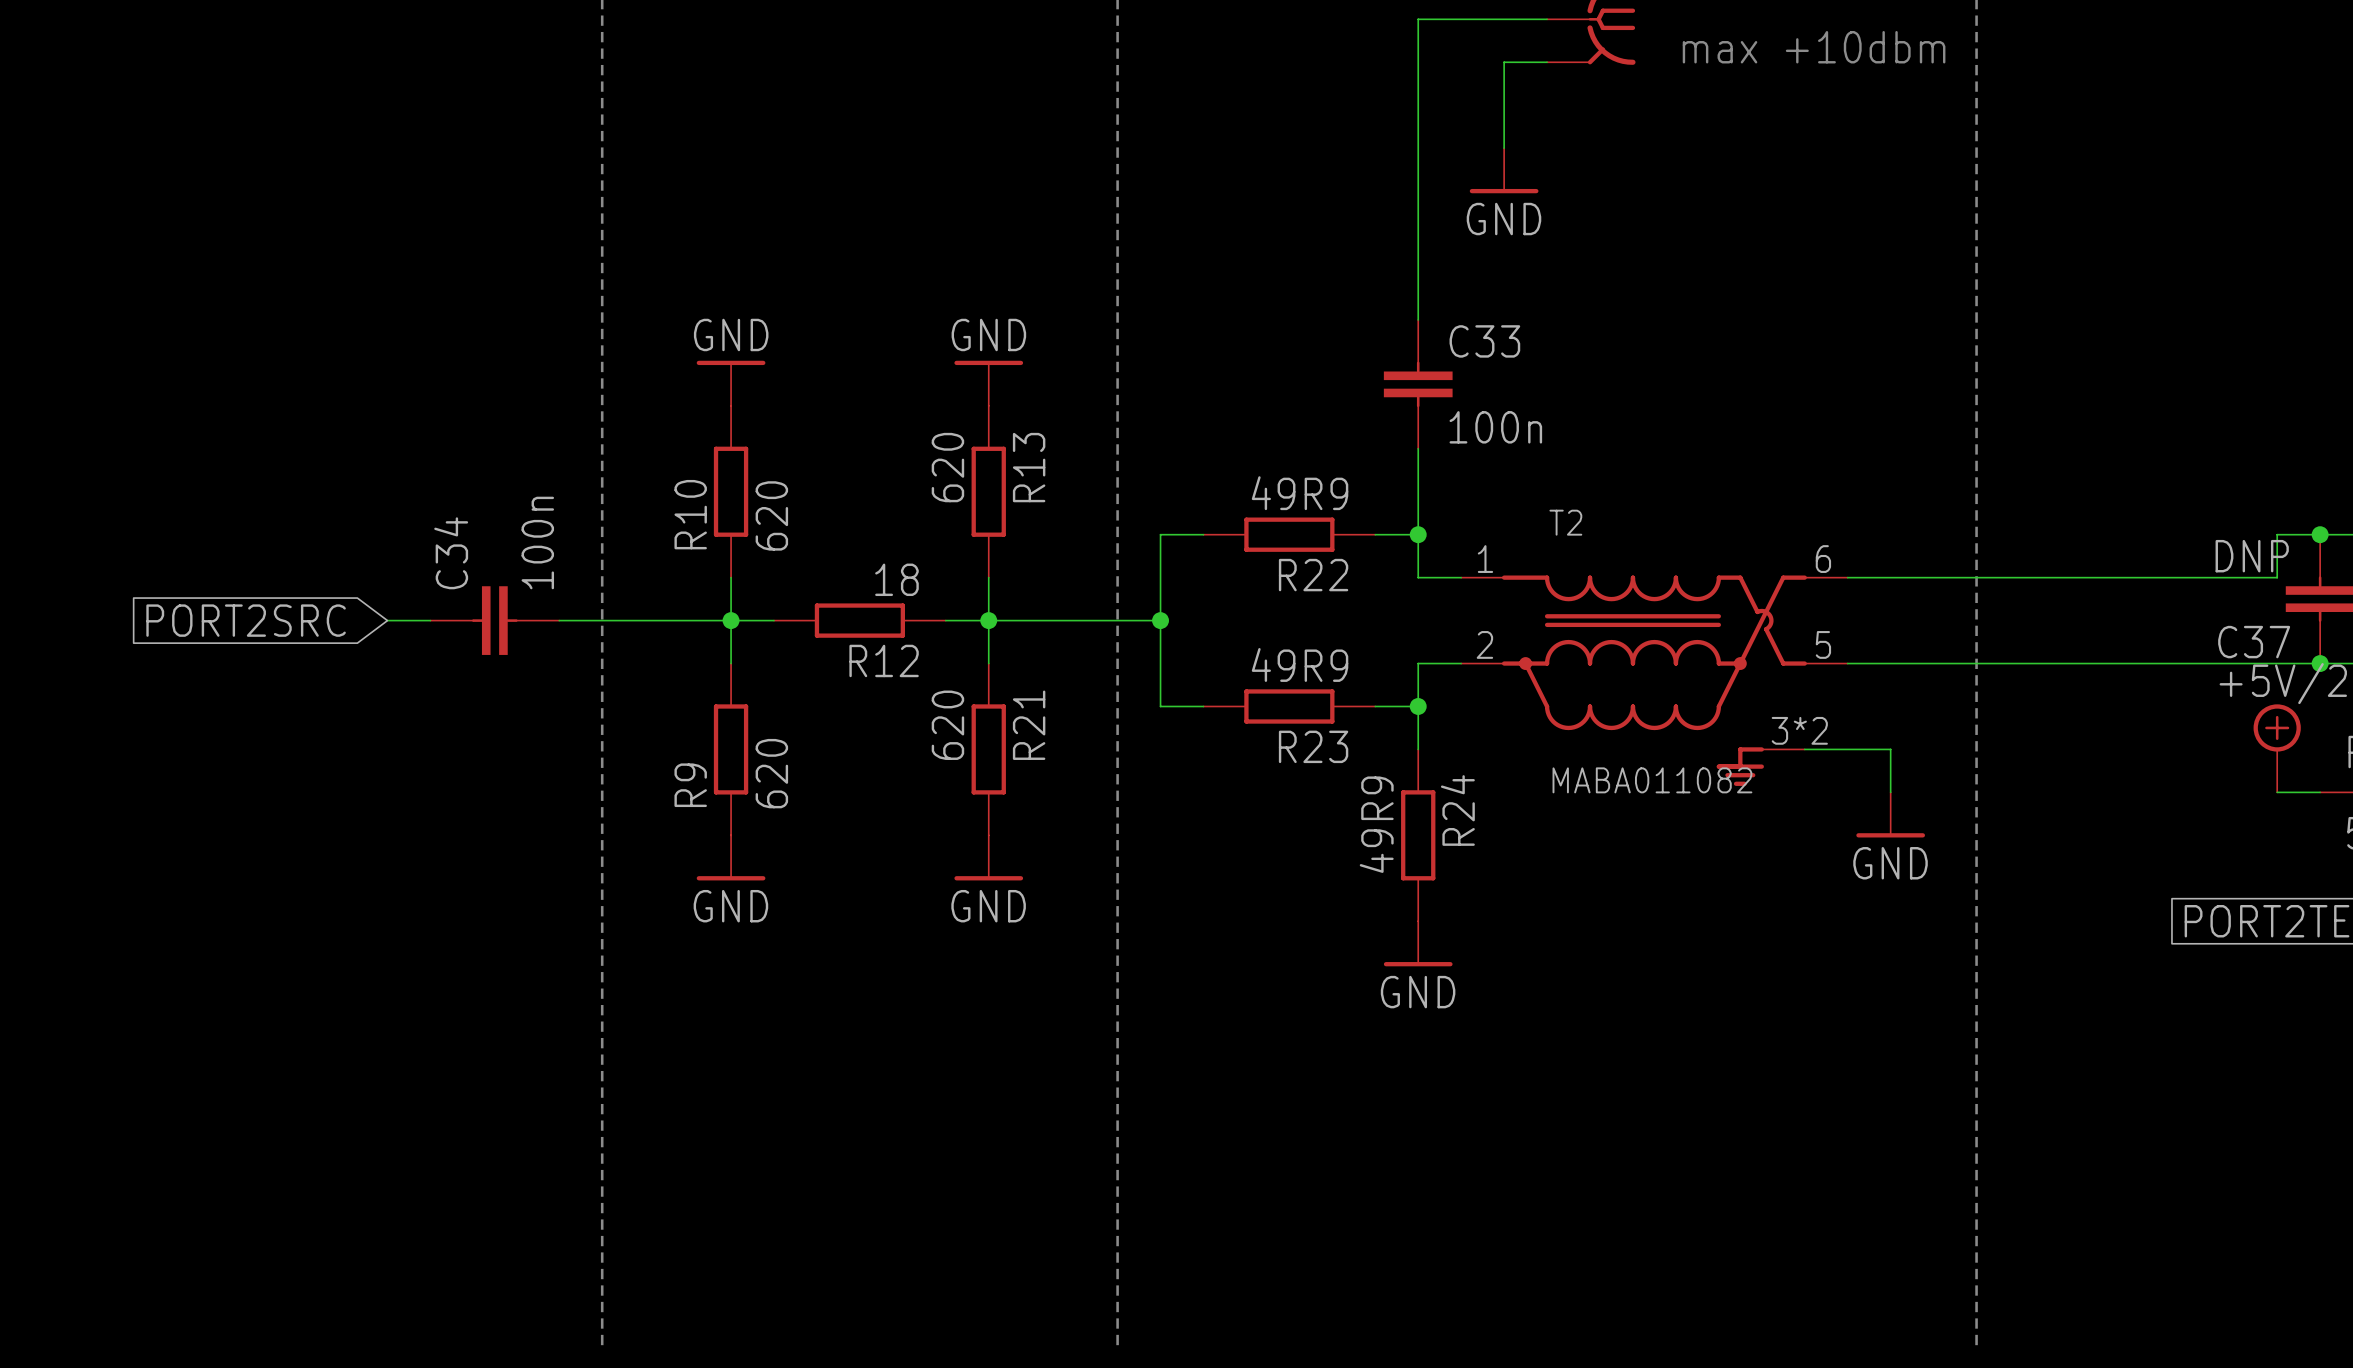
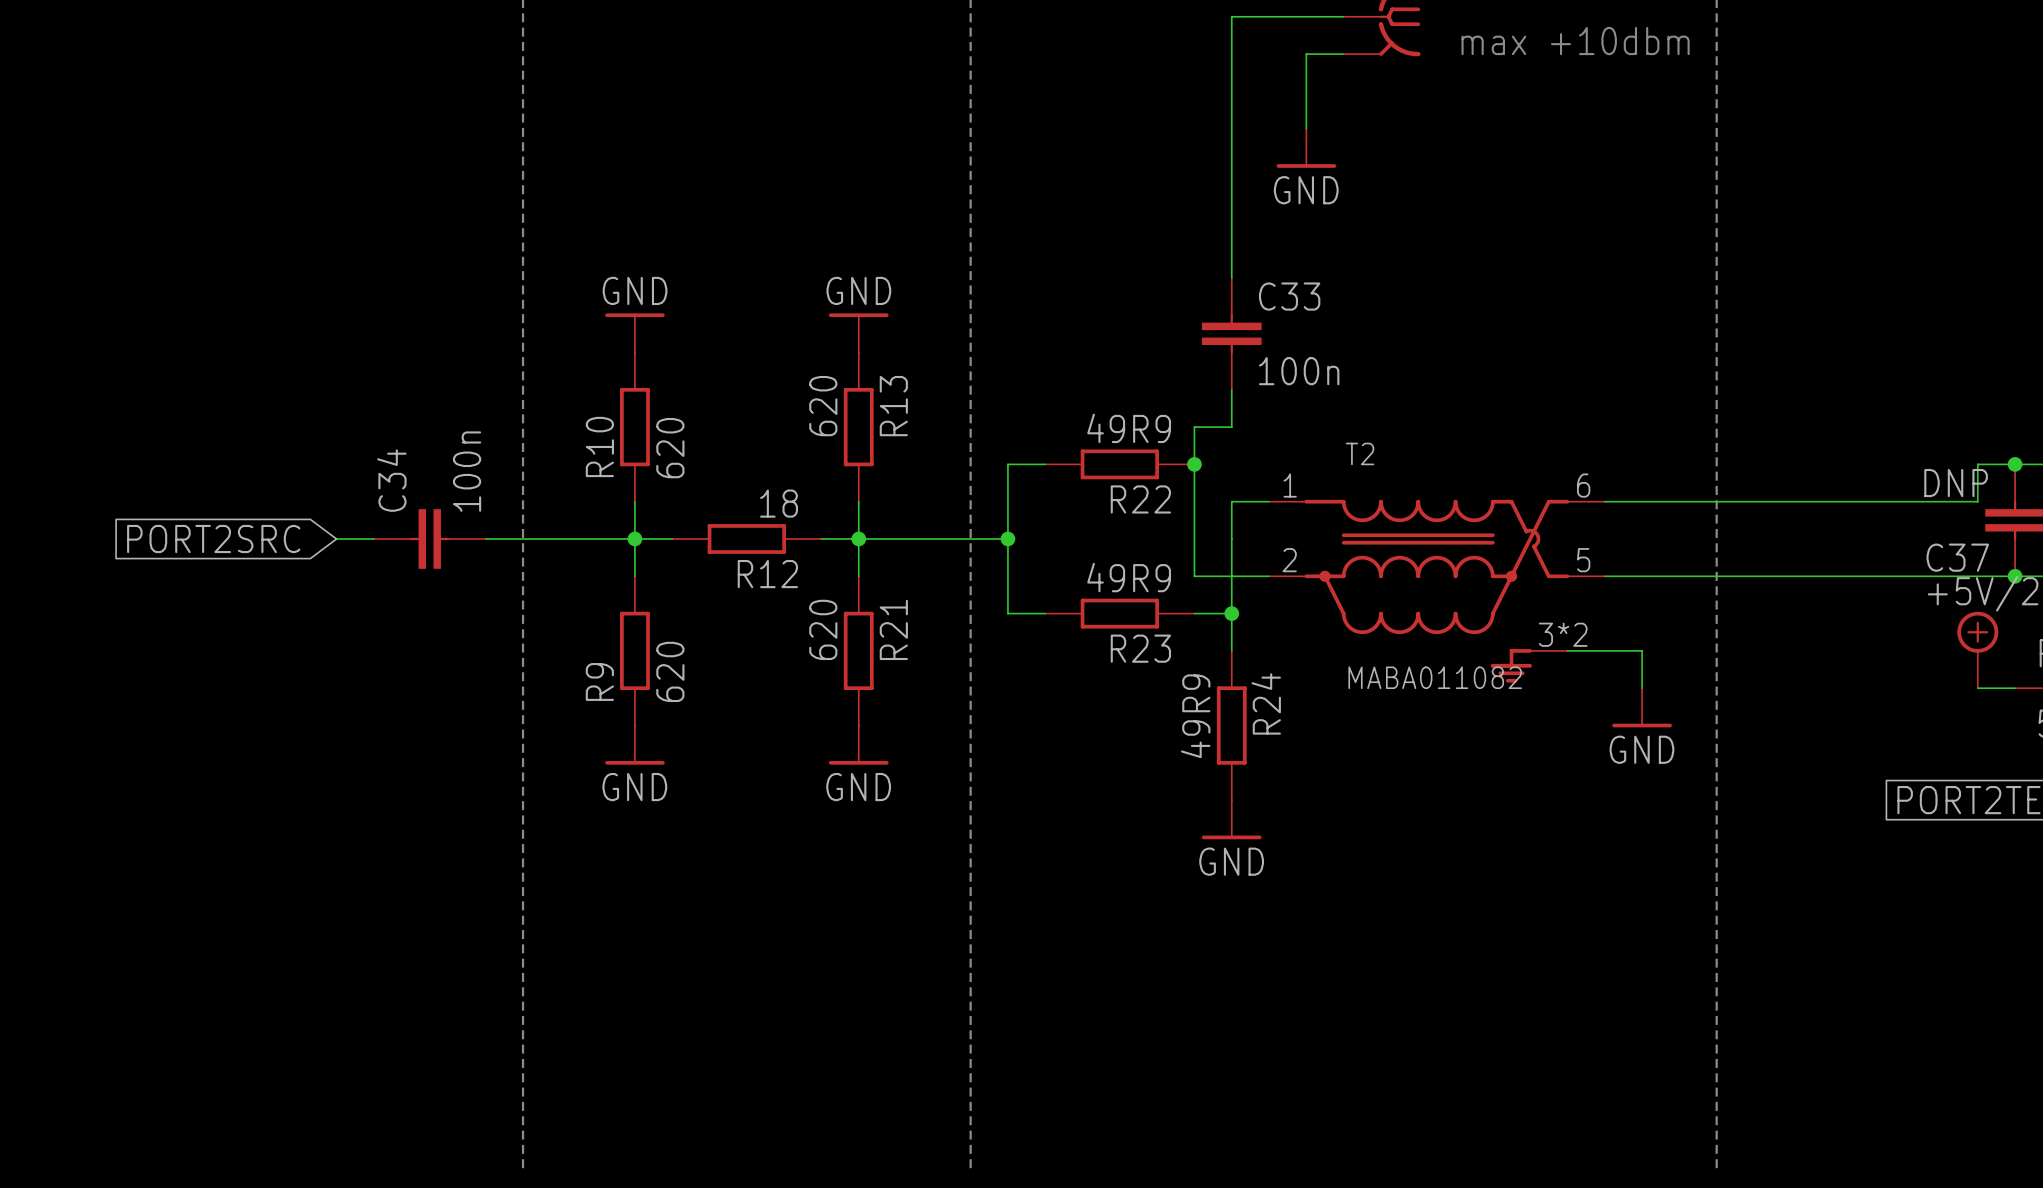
wire: (1418, 491) (1418, 577) -> (1231, 427) (1194, 427) (1194, 576) (1231, 576) (1231, 501)
wire: (1375, 534) (1418, 534) -> none
junction position: (1418, 534) -> (1194, 464)

